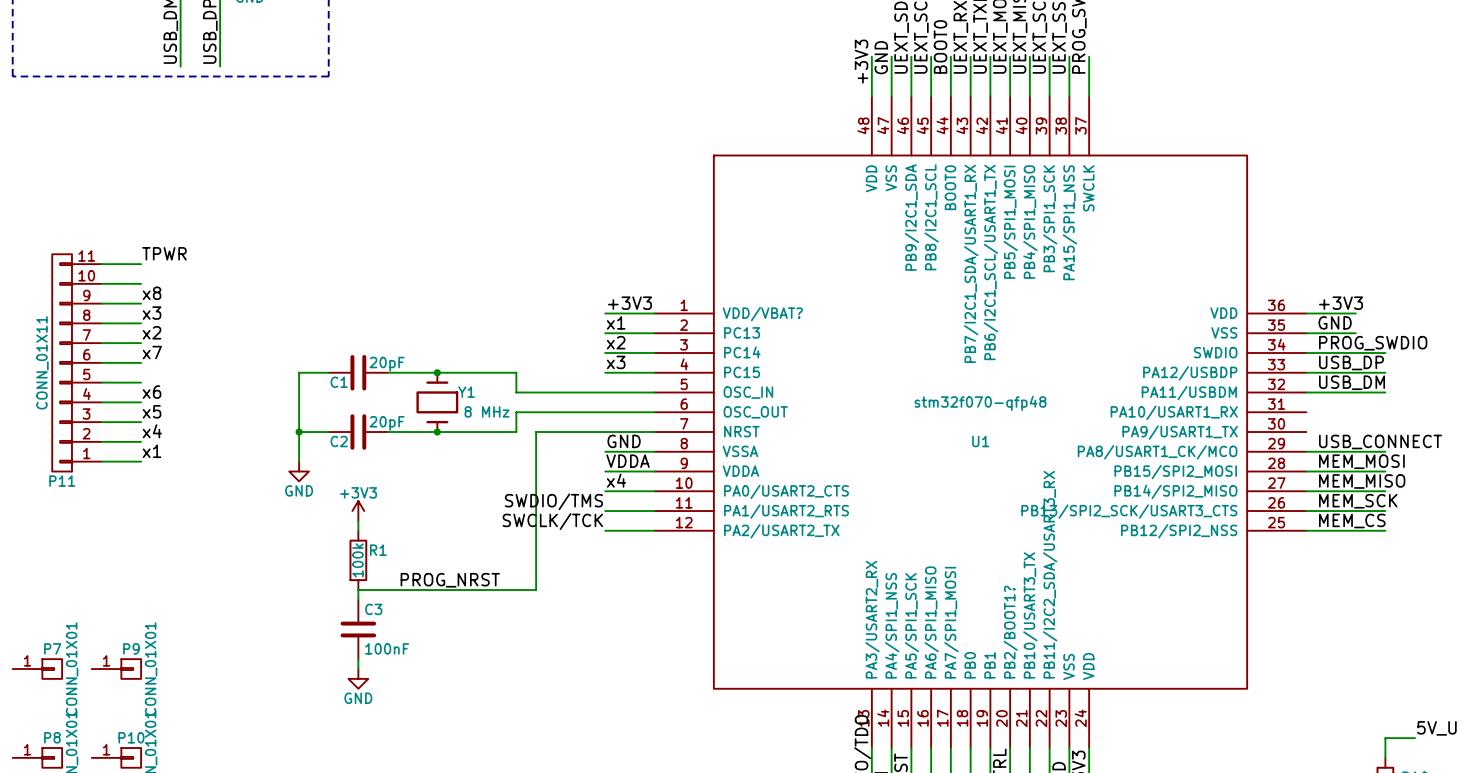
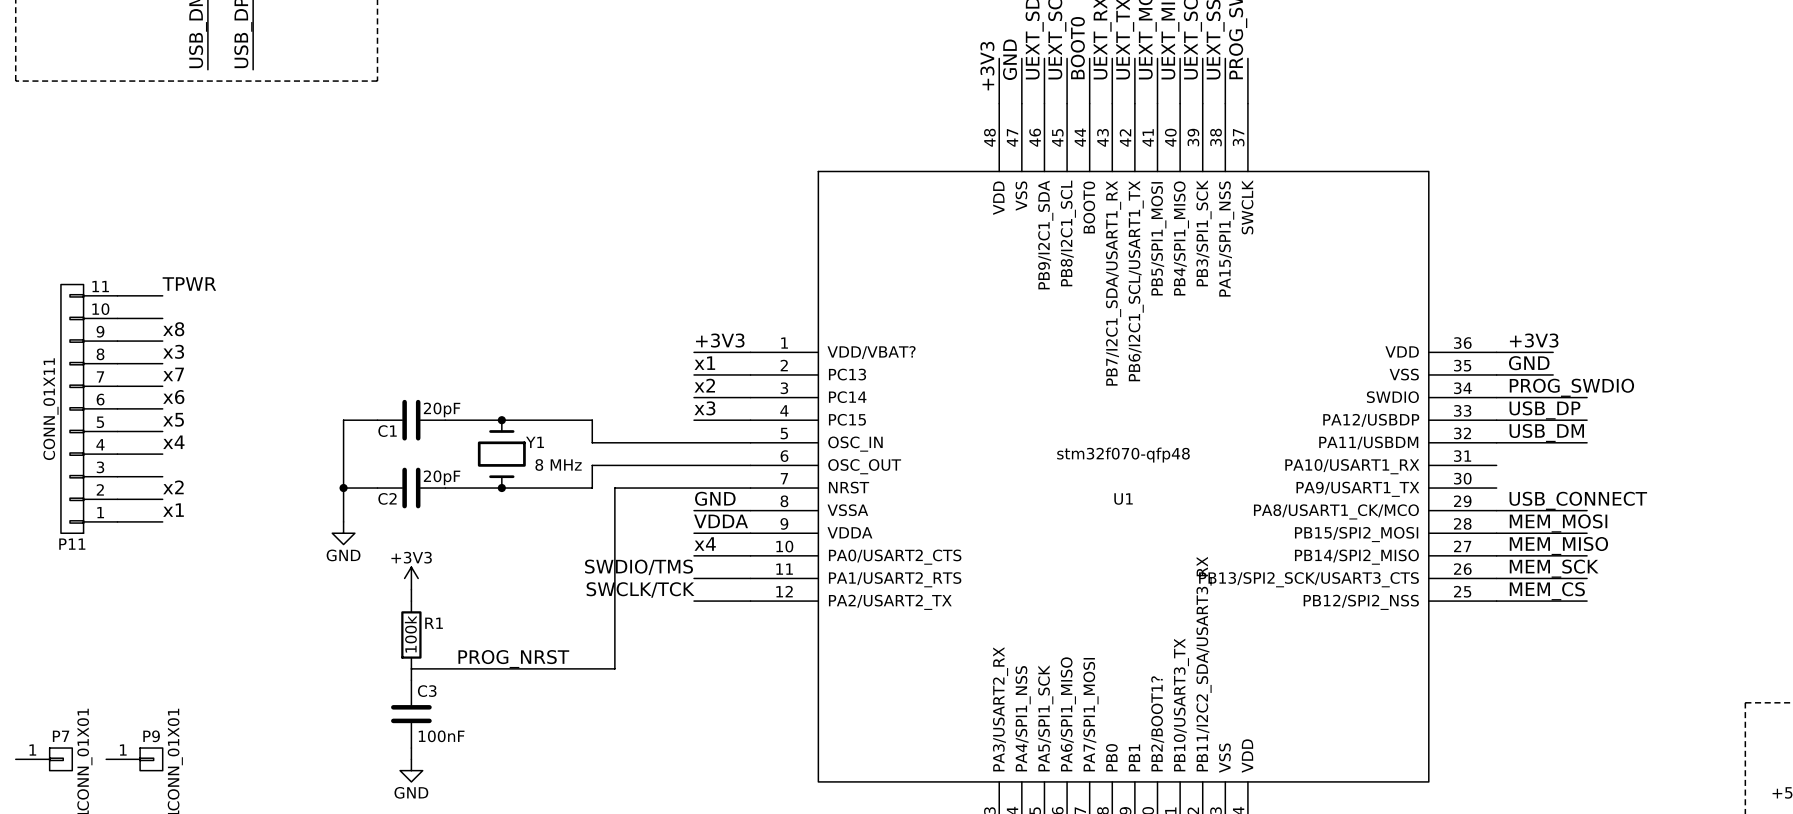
label: x2 (152, 332) -> x7 (173, 374)
label: x7 (152, 352) -> x6 (173, 397)
label: x6 (152, 392) -> x4 (173, 442)
label position: x5 (152, 411) -> x5 (173, 419)
label: x4 (152, 431) -> x2 (173, 487)

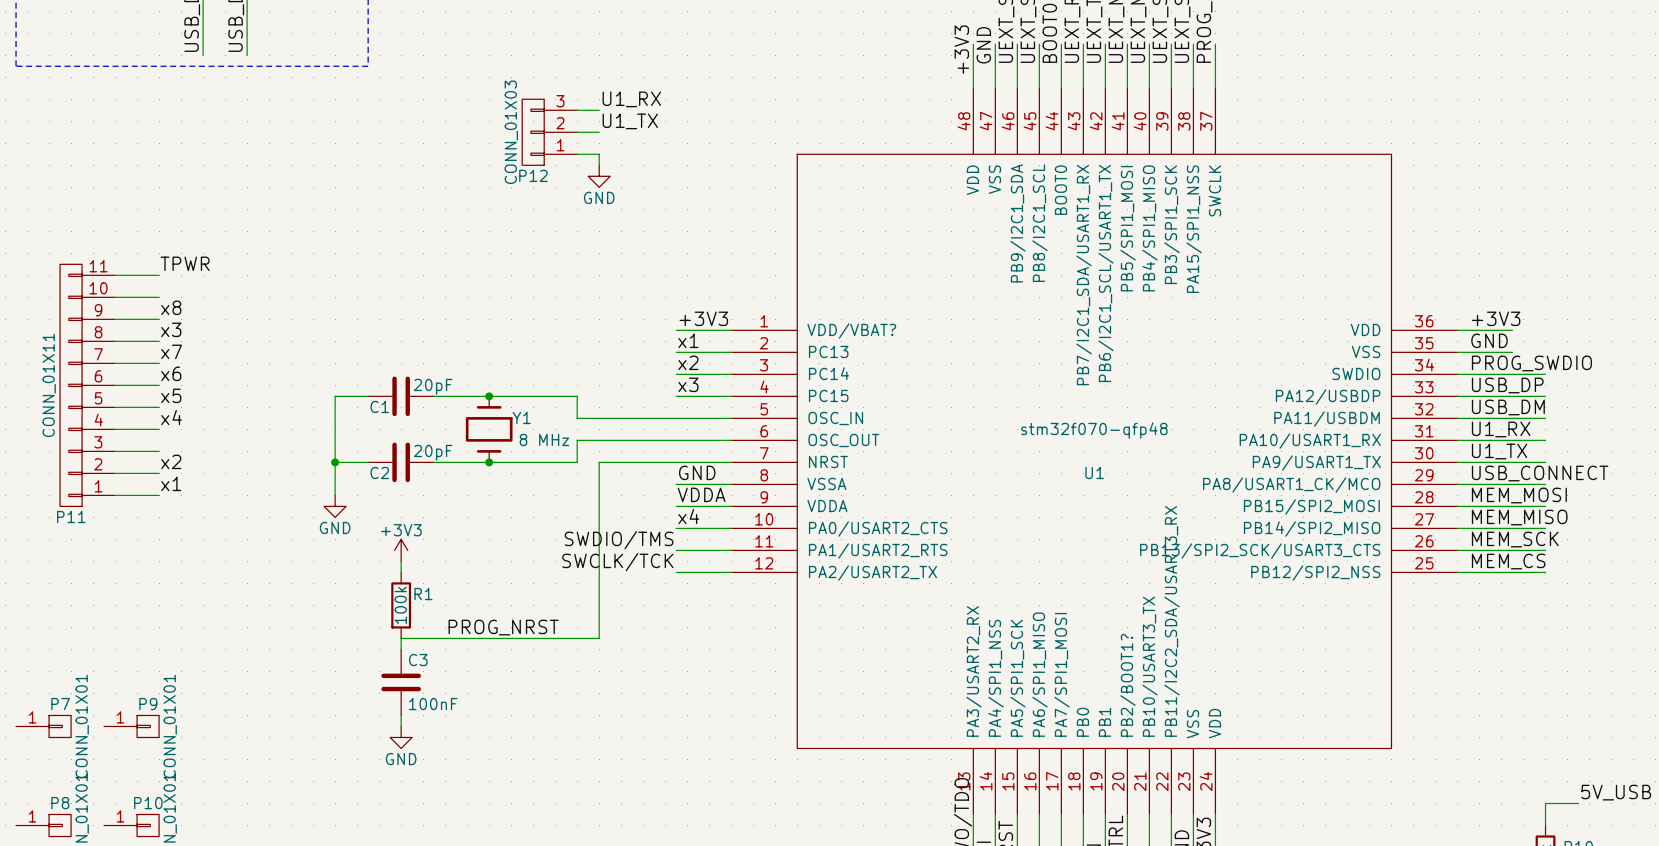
label: none -> U1_RX (631, 99)
wire: none -> (577, 110) (599, 110)
label: none -> U1_TX (630, 121)
P12: none -> CONN_01X03 (549, 132)
wire: none -> (577, 132) (599, 132)
wire: none -> (577, 154) (599, 154) (599, 165)
power symbol: none -> GND (599, 176)
label: none -> U1_RX (1501, 429)
wire: none -> (1457, 440) (1545, 440)
label: none -> U1_TX (1499, 451)
wire: none -> (1457, 462) (1545, 462)

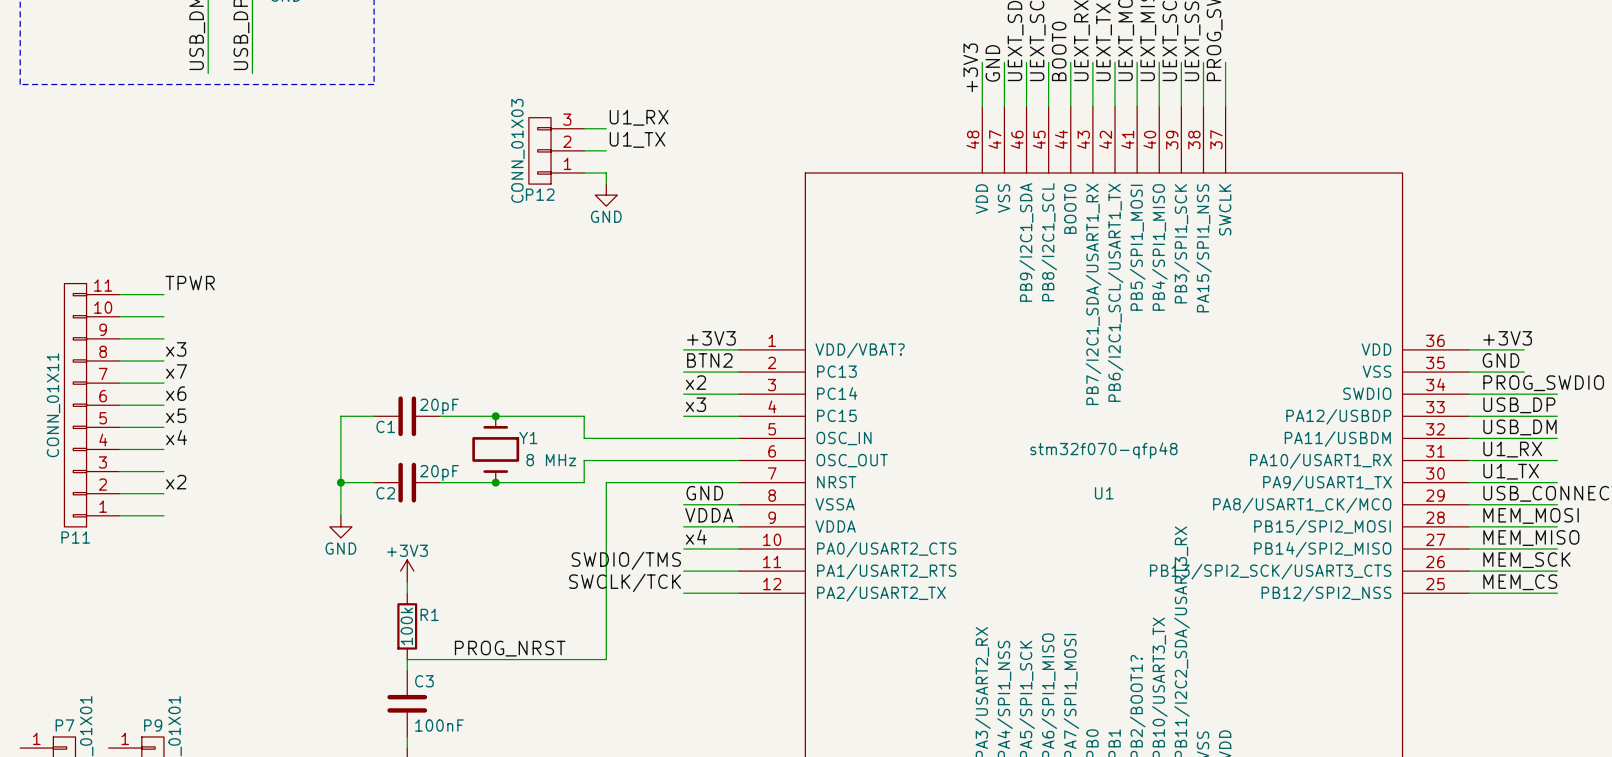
label: x8 (171, 307) -> none
label: x1 (688, 340) -> BTN2 (709, 360)
label: x1 (171, 483) -> none

